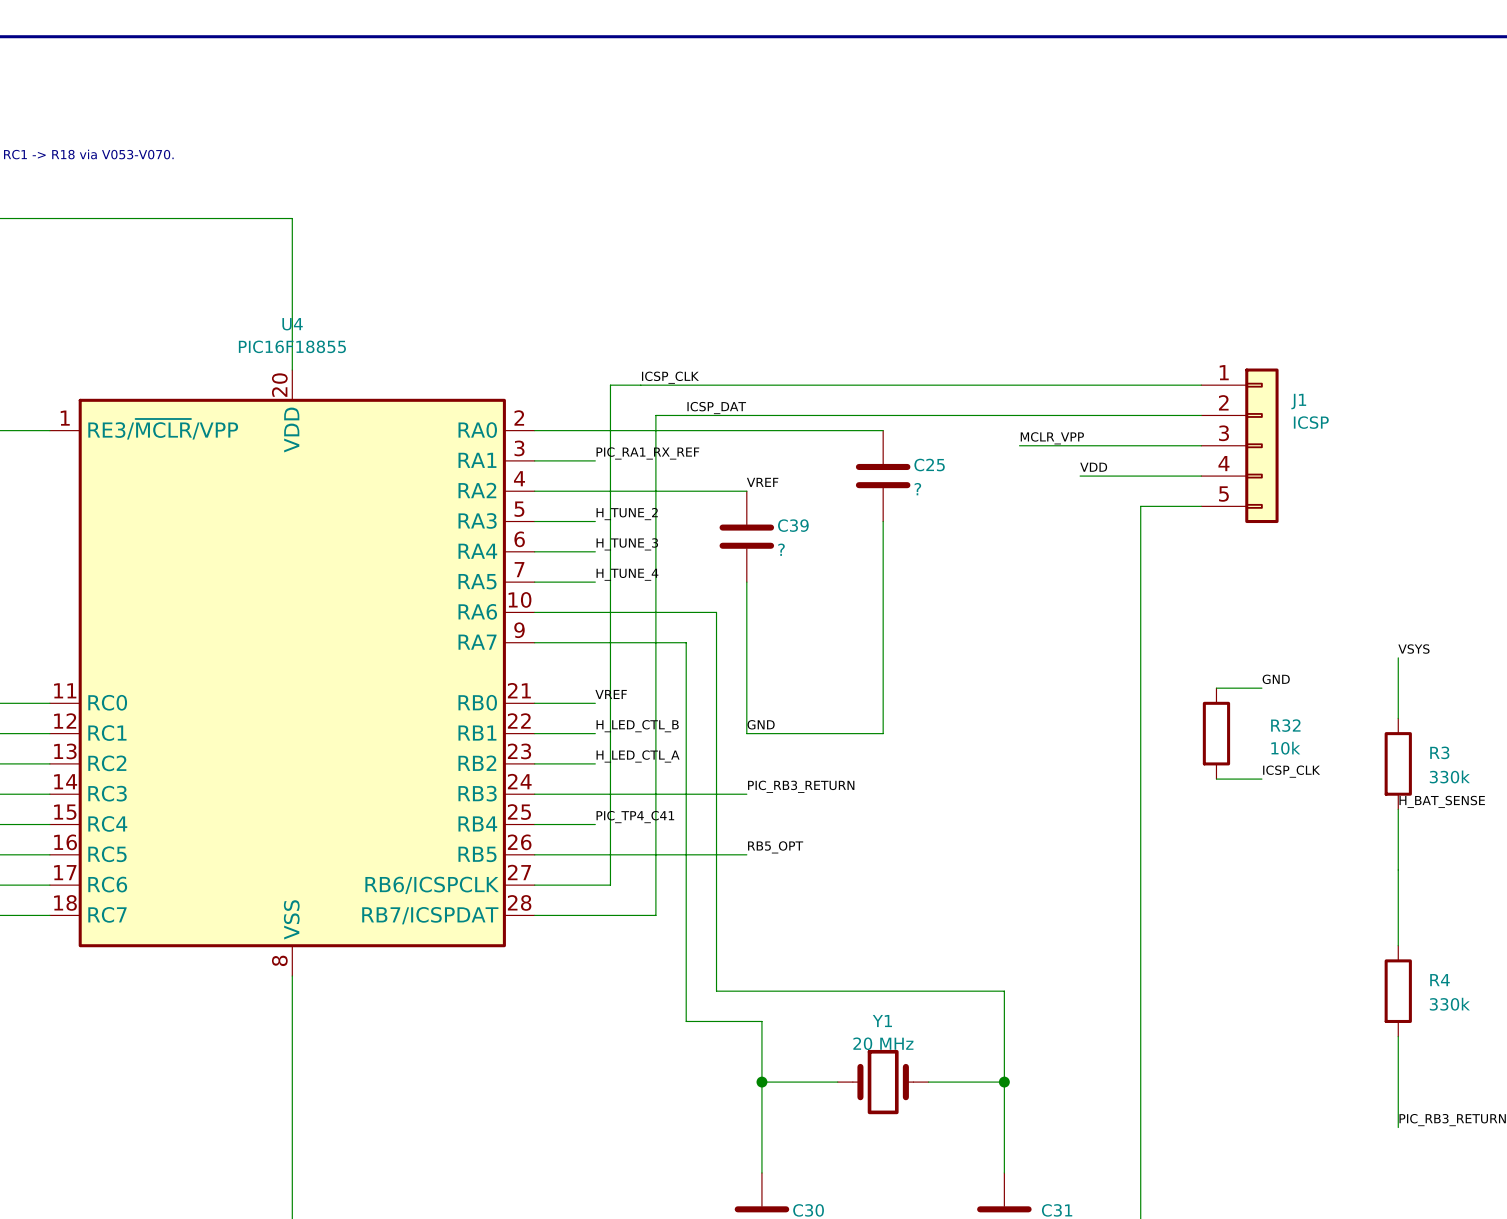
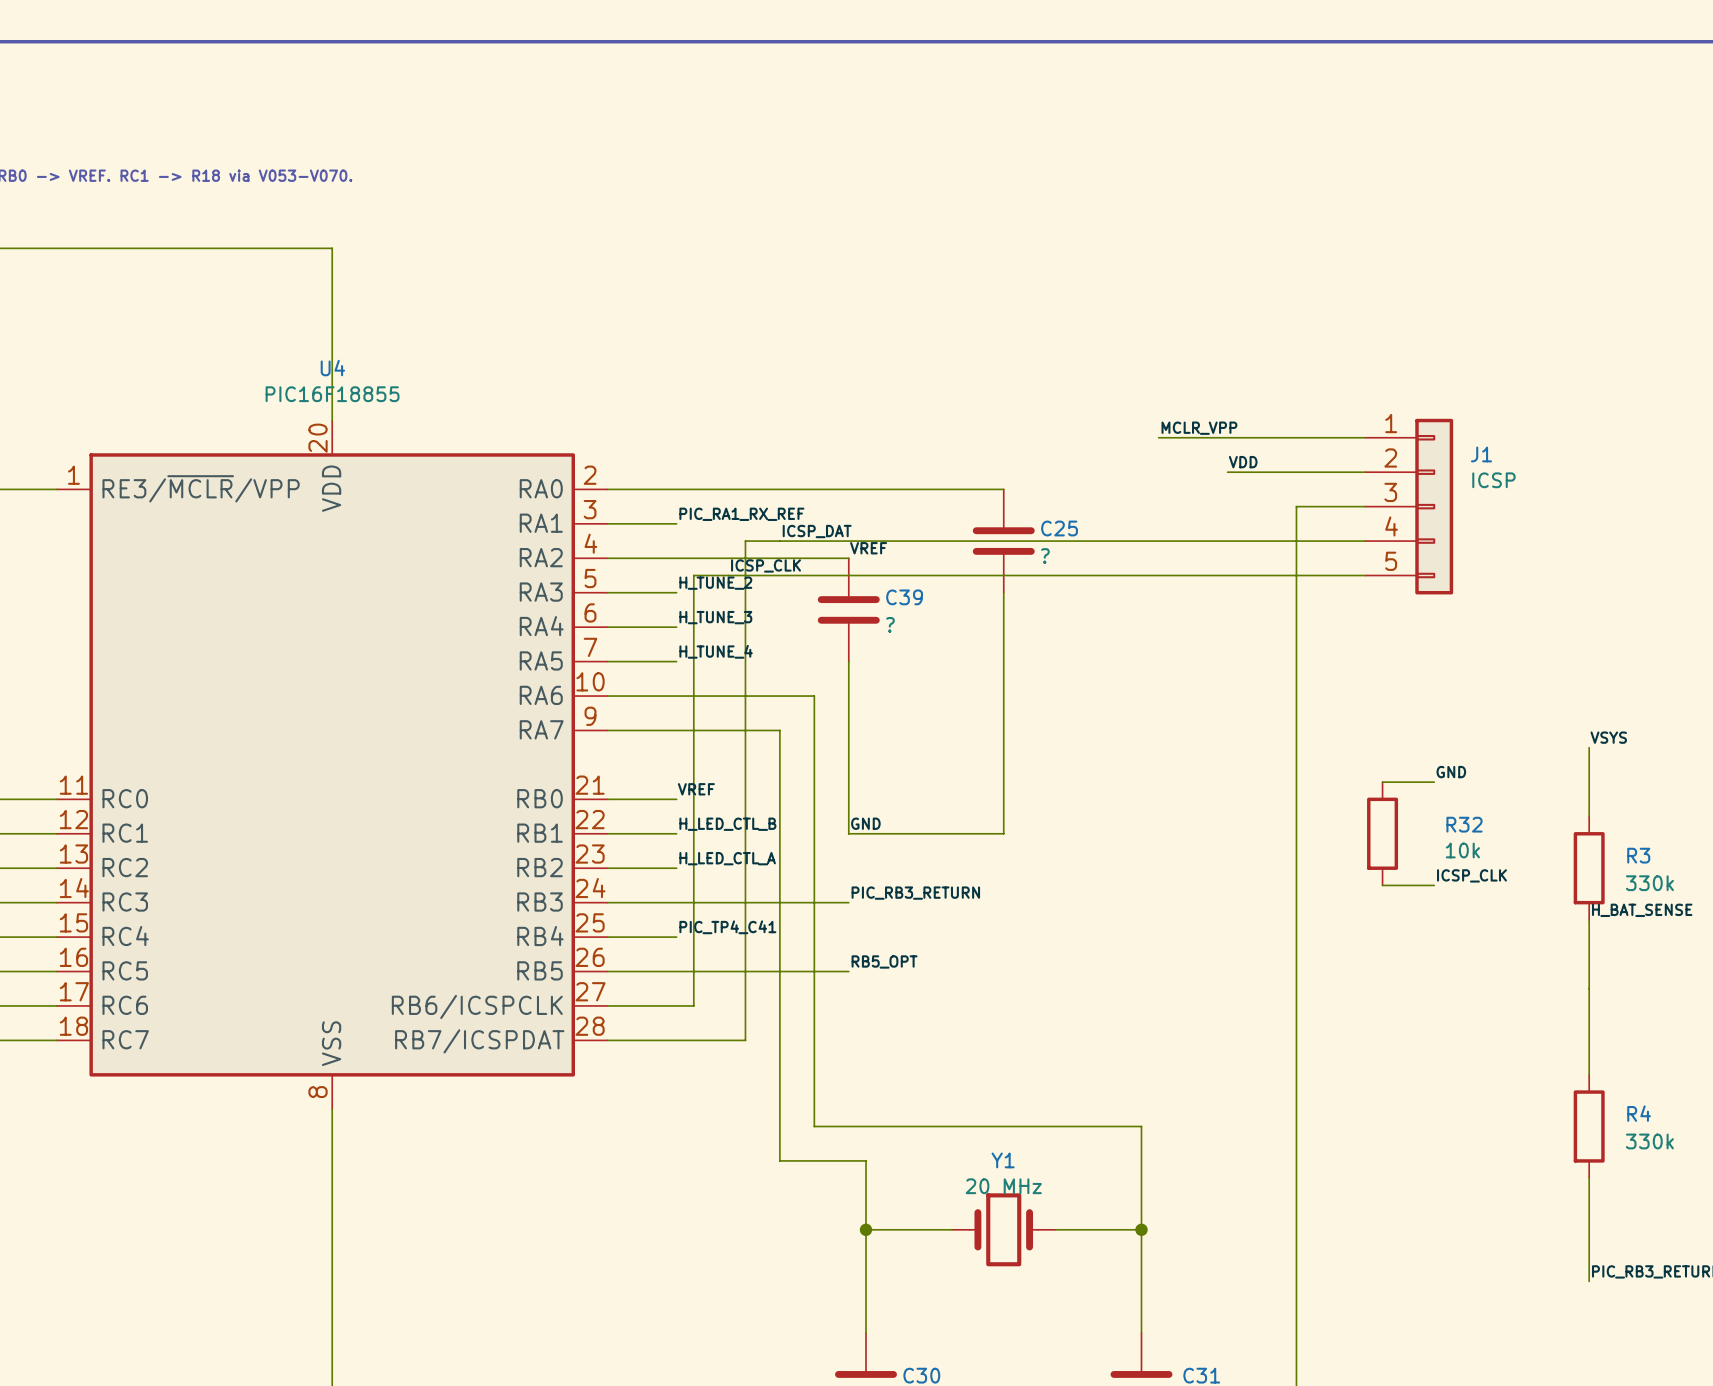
label position: ICSP_CLK (670, 377) -> ICSP_CLK (766, 565)
wire: (1019, 385) (610, 385) (610, 506) -> (1296, 506) (1296, 575) (693, 575)
label position: ICSP_DAT (716, 408) -> ICSP_DAT (817, 531)
wire: (1080, 415) (655, 415) (655, 476) -> (1227, 541) (745, 541)
label position: MCLR_VPP (1052, 438) -> MCLR_VPP (1199, 428)
wire: (1019, 445) (1140, 445) -> none
label position: VDD (1093, 467) -> VDD (1243, 462)

